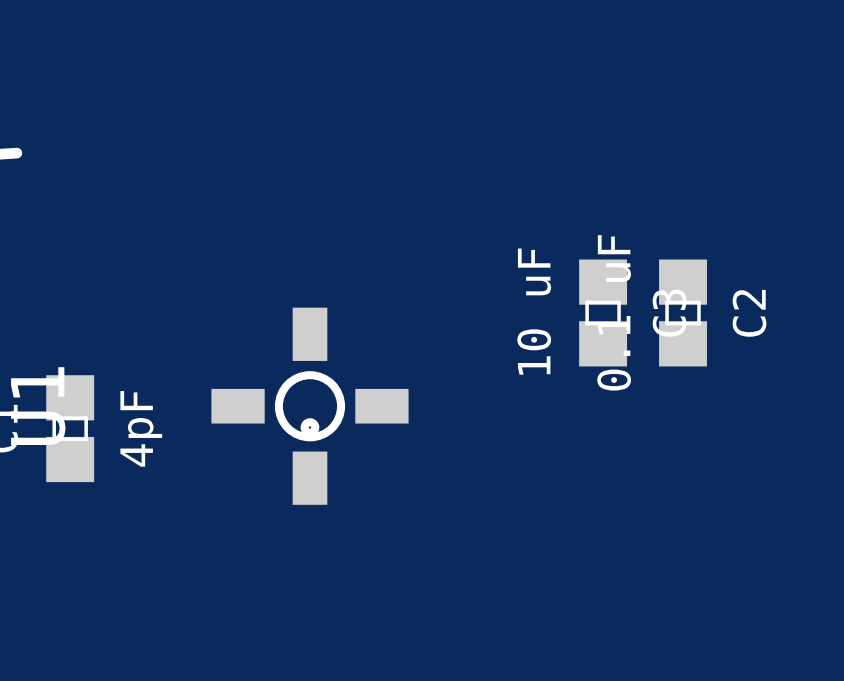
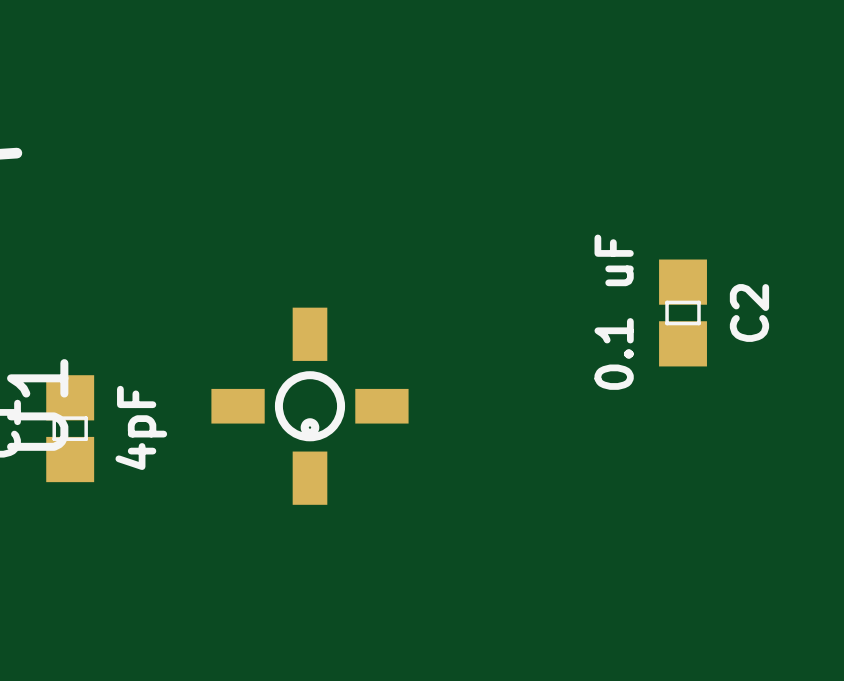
part: 10 uF (603, 312) -> none

